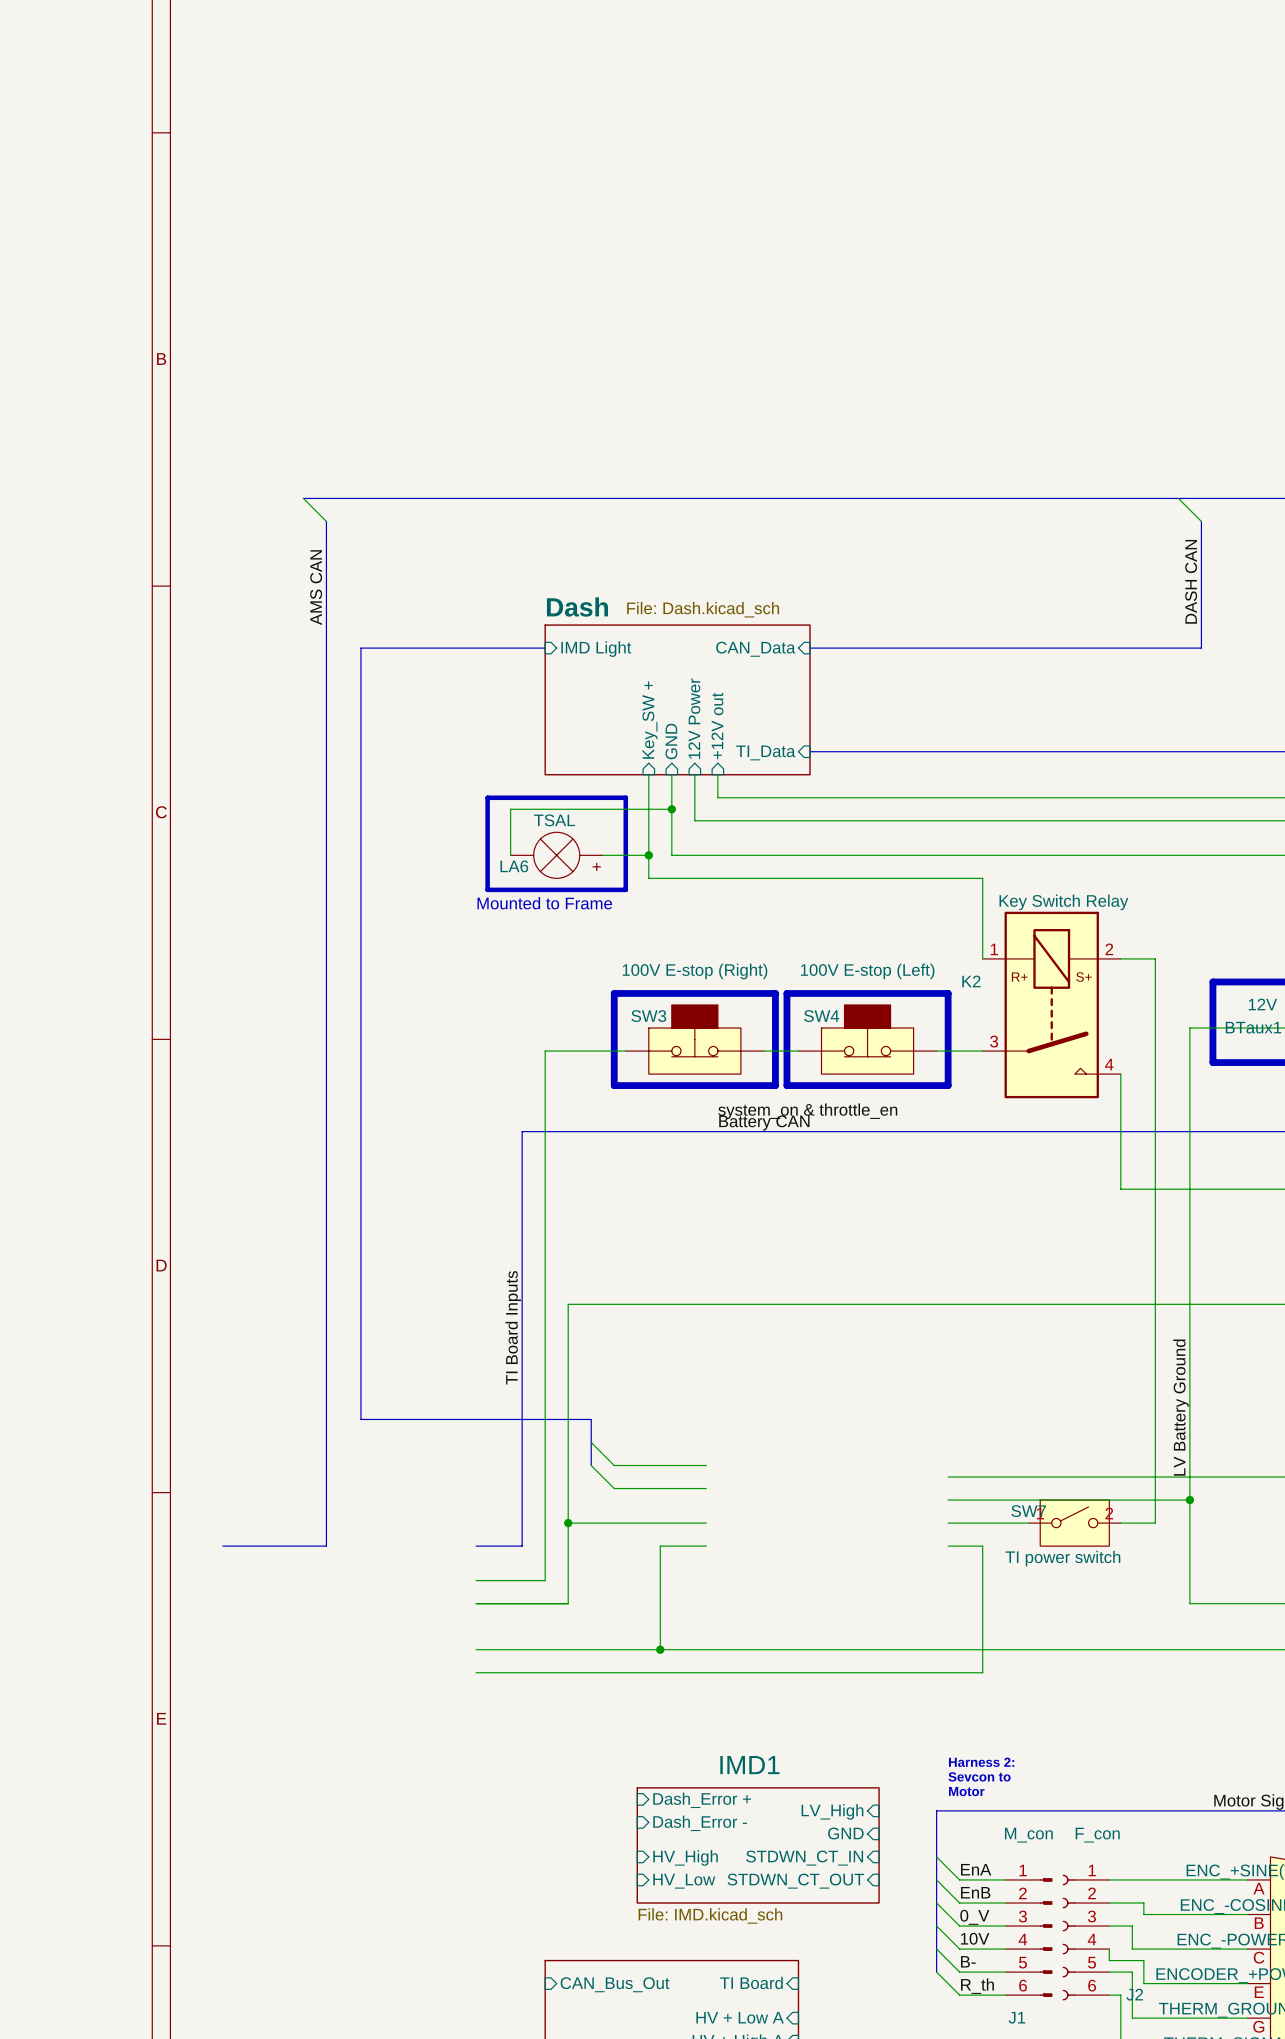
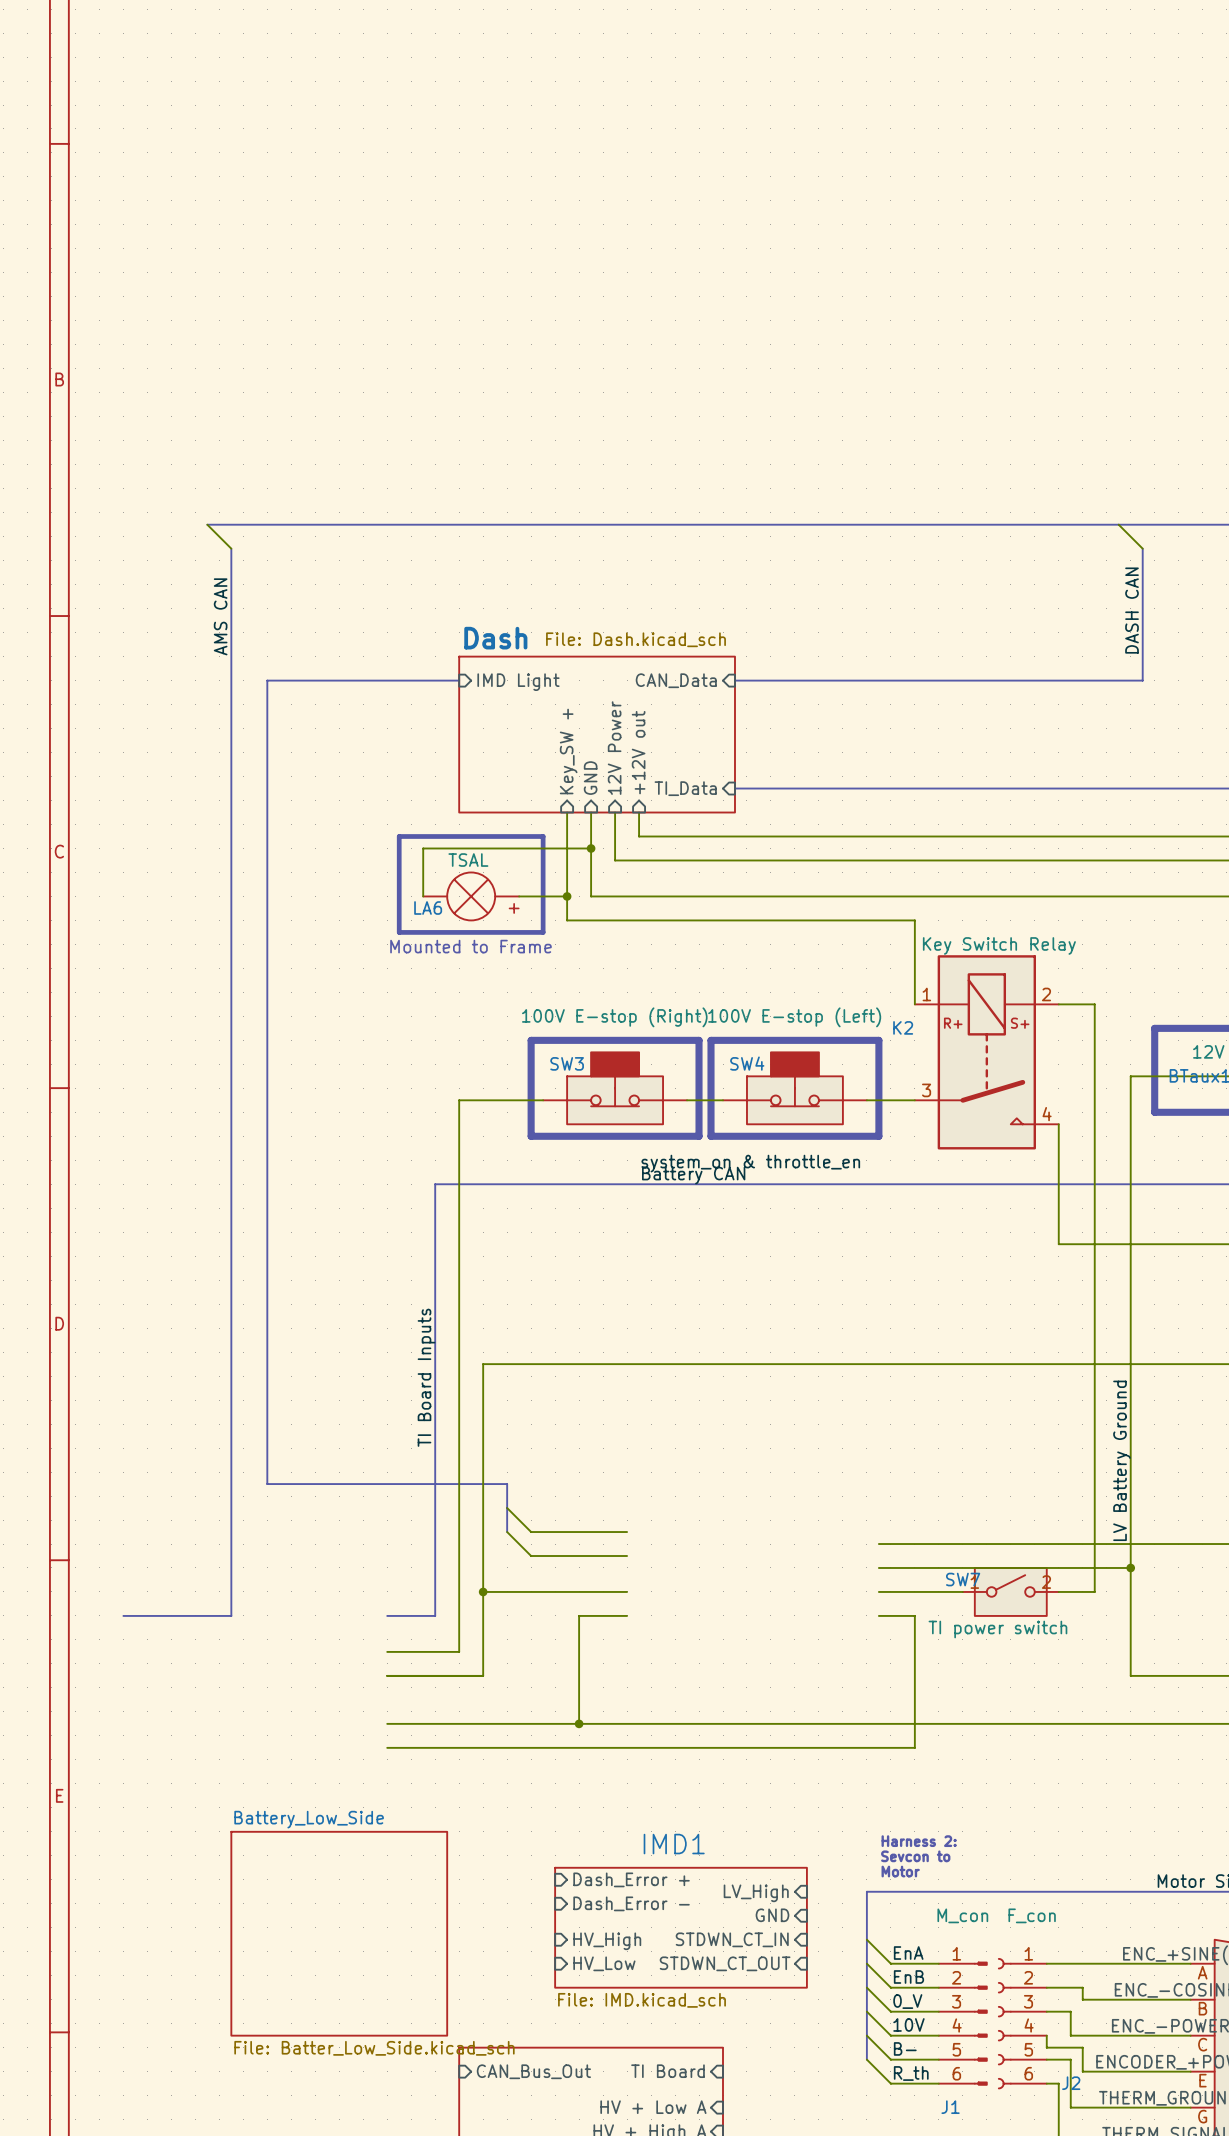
sheet Battery_Low_Side: none -> File: Batter_Low_Side.kicad_sch (339, 1933)

